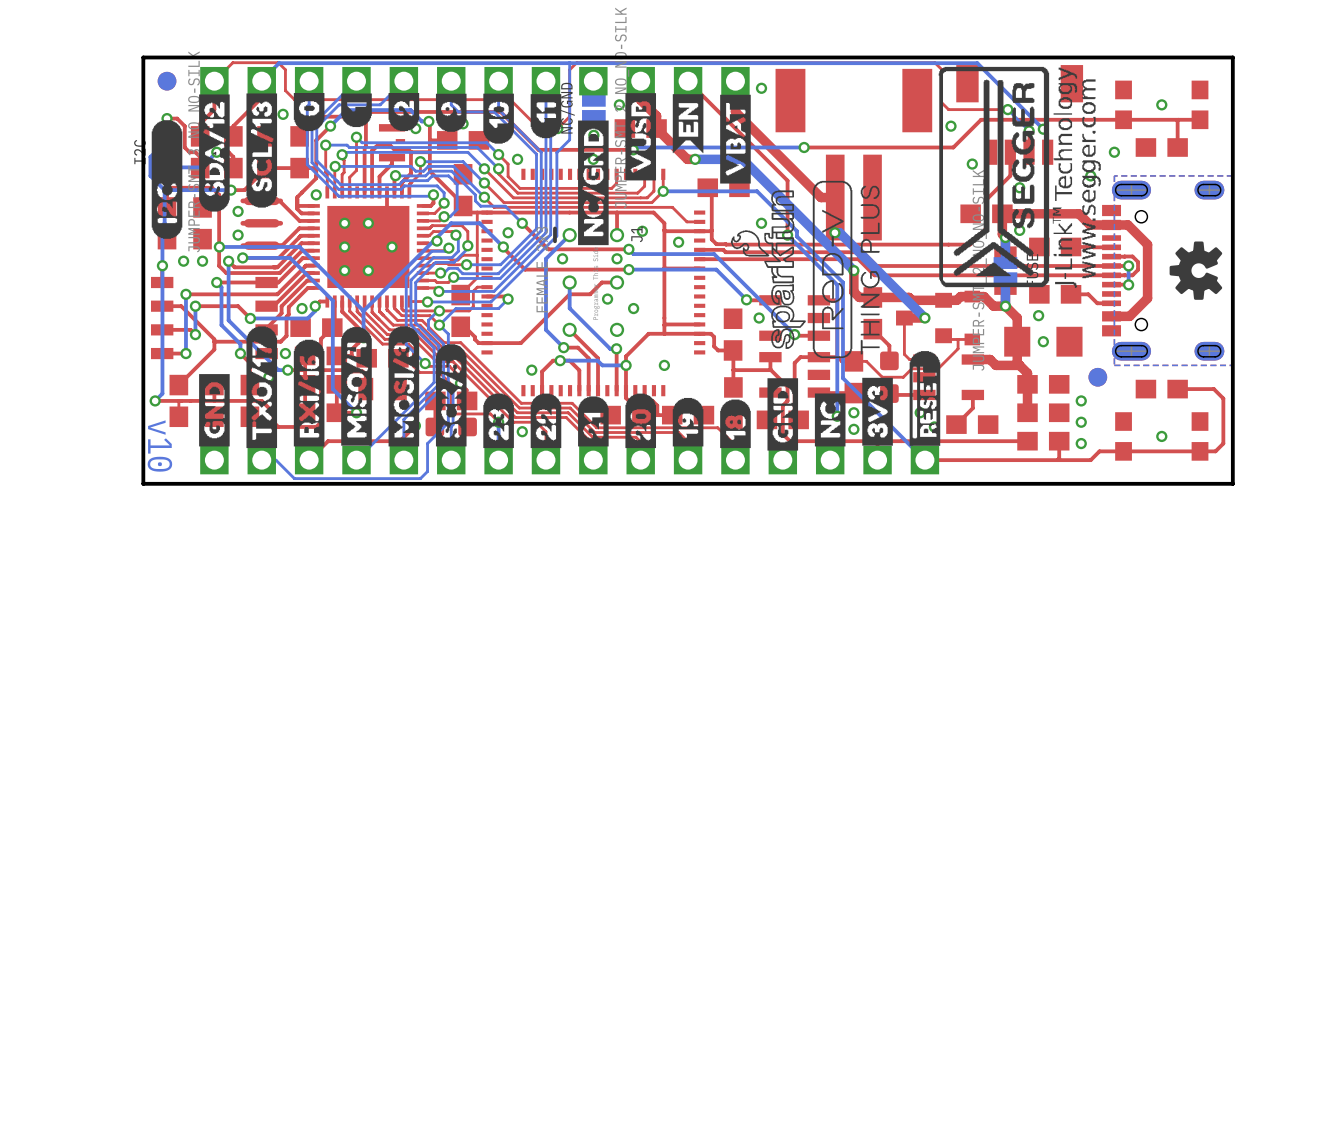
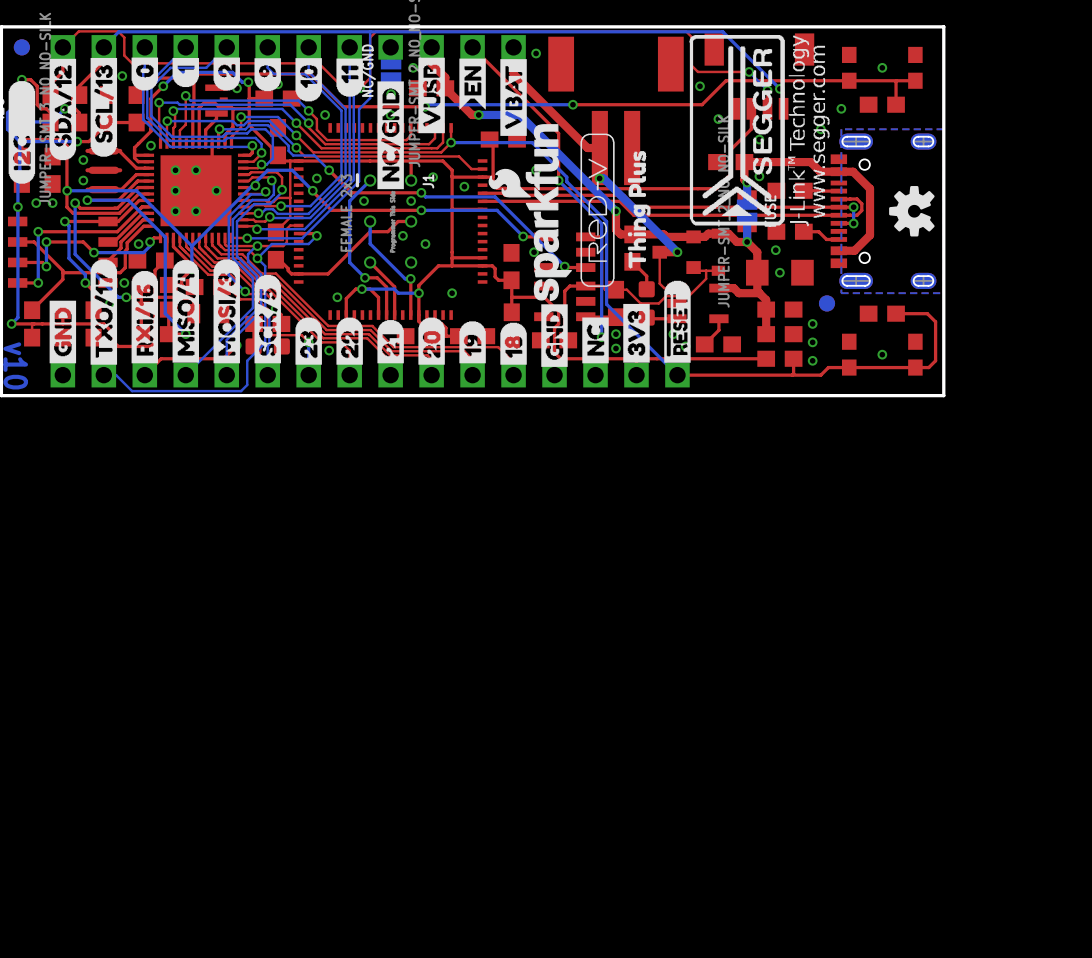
drawing shape: [860, 185, 880, 355] -> [627, 151, 651, 269]
drawing shape: [730, 190, 806, 349] -> [488, 124, 572, 302]

